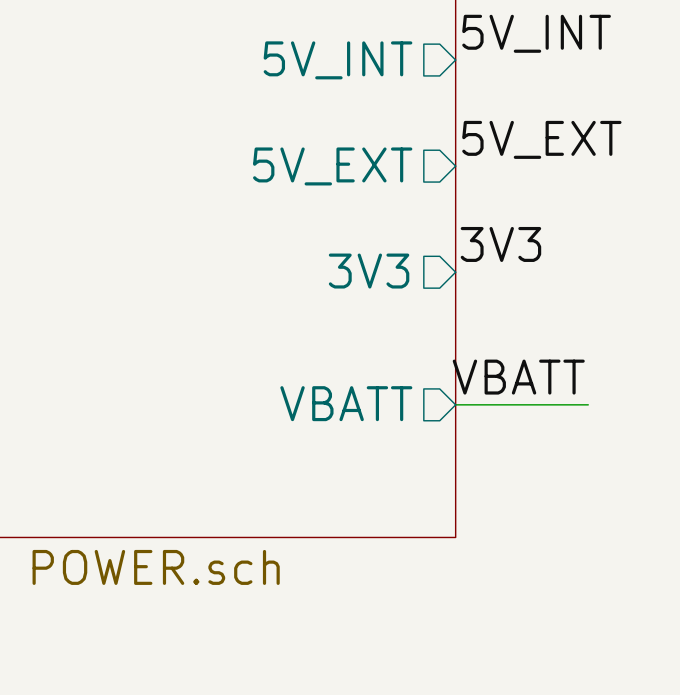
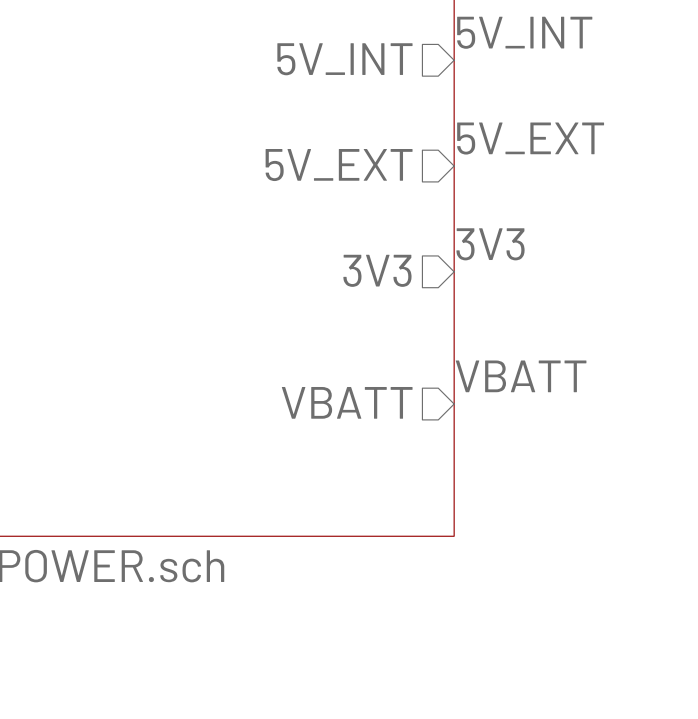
label position: VBATT (518, 377) -> VBATT (521, 376)
wire: (455, 404) (588, 404) -> none

